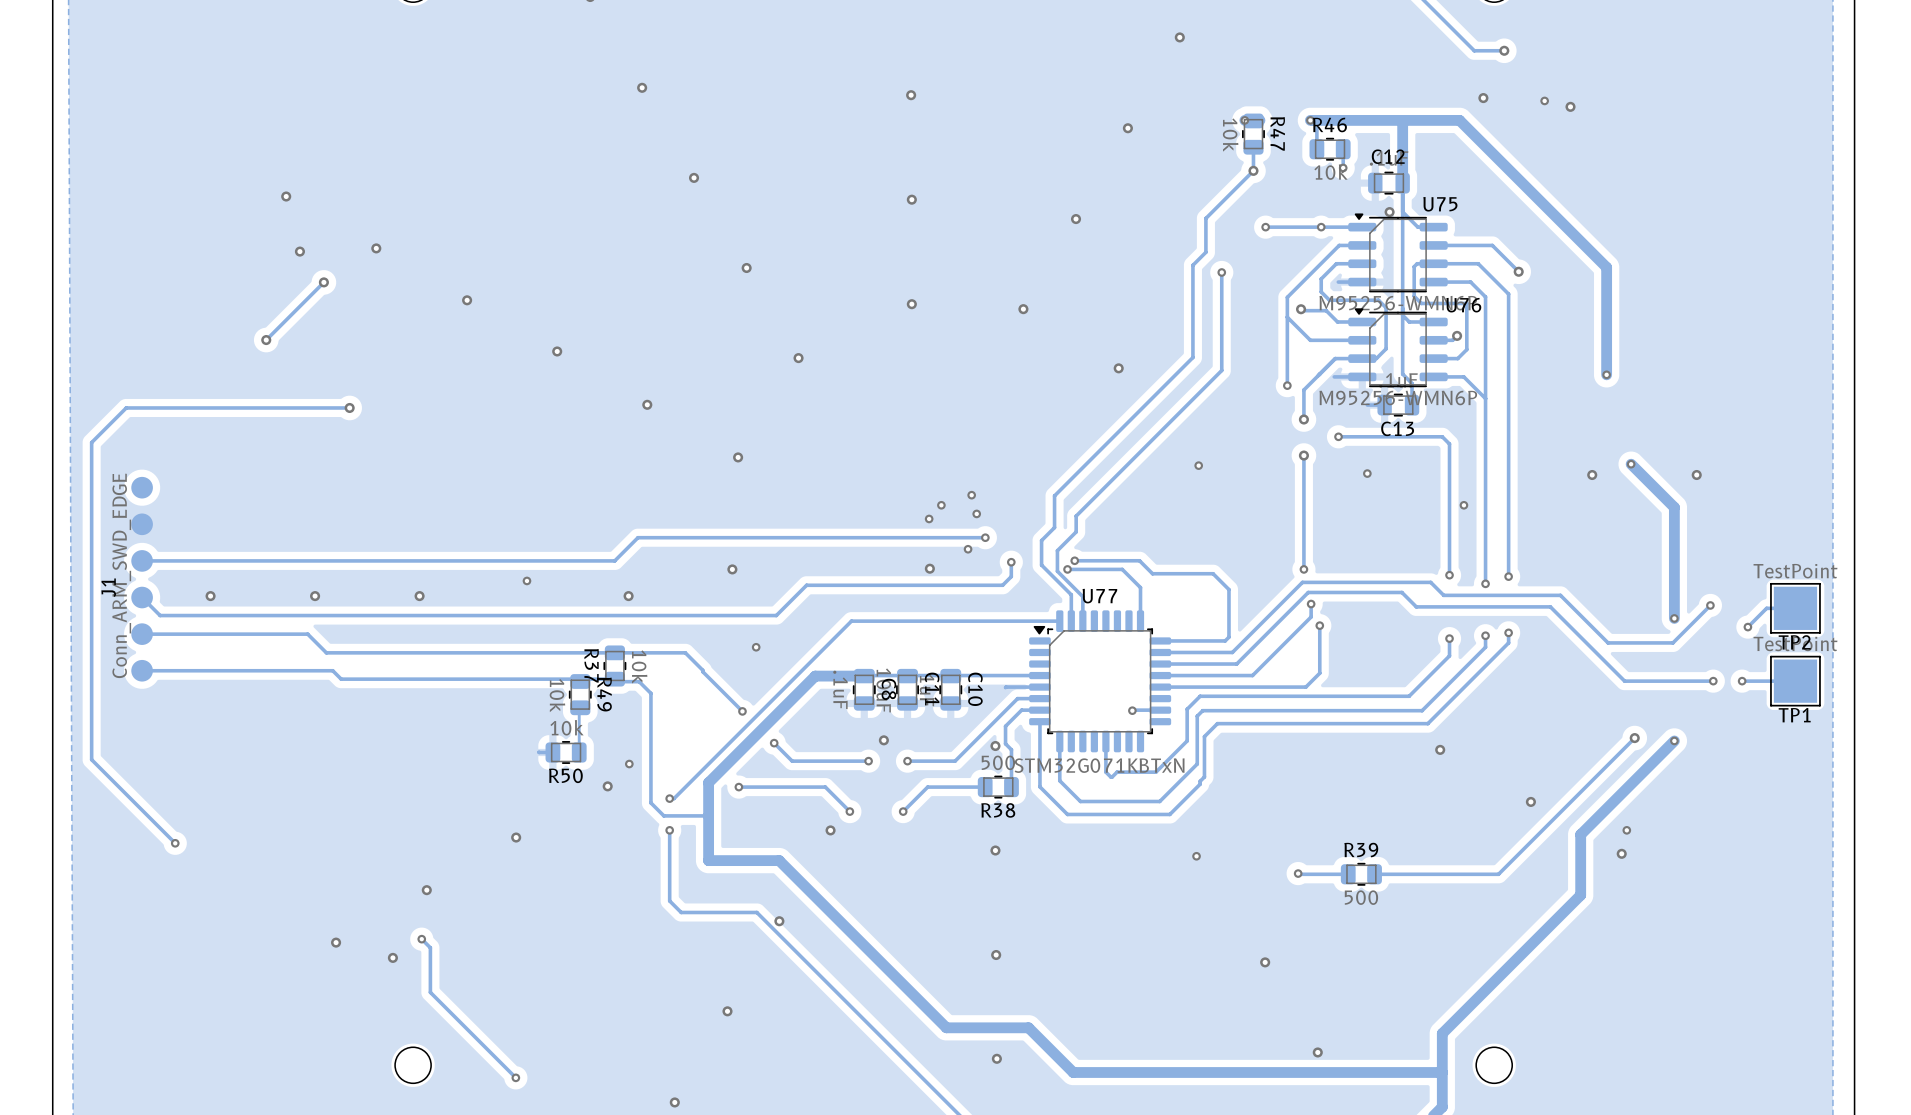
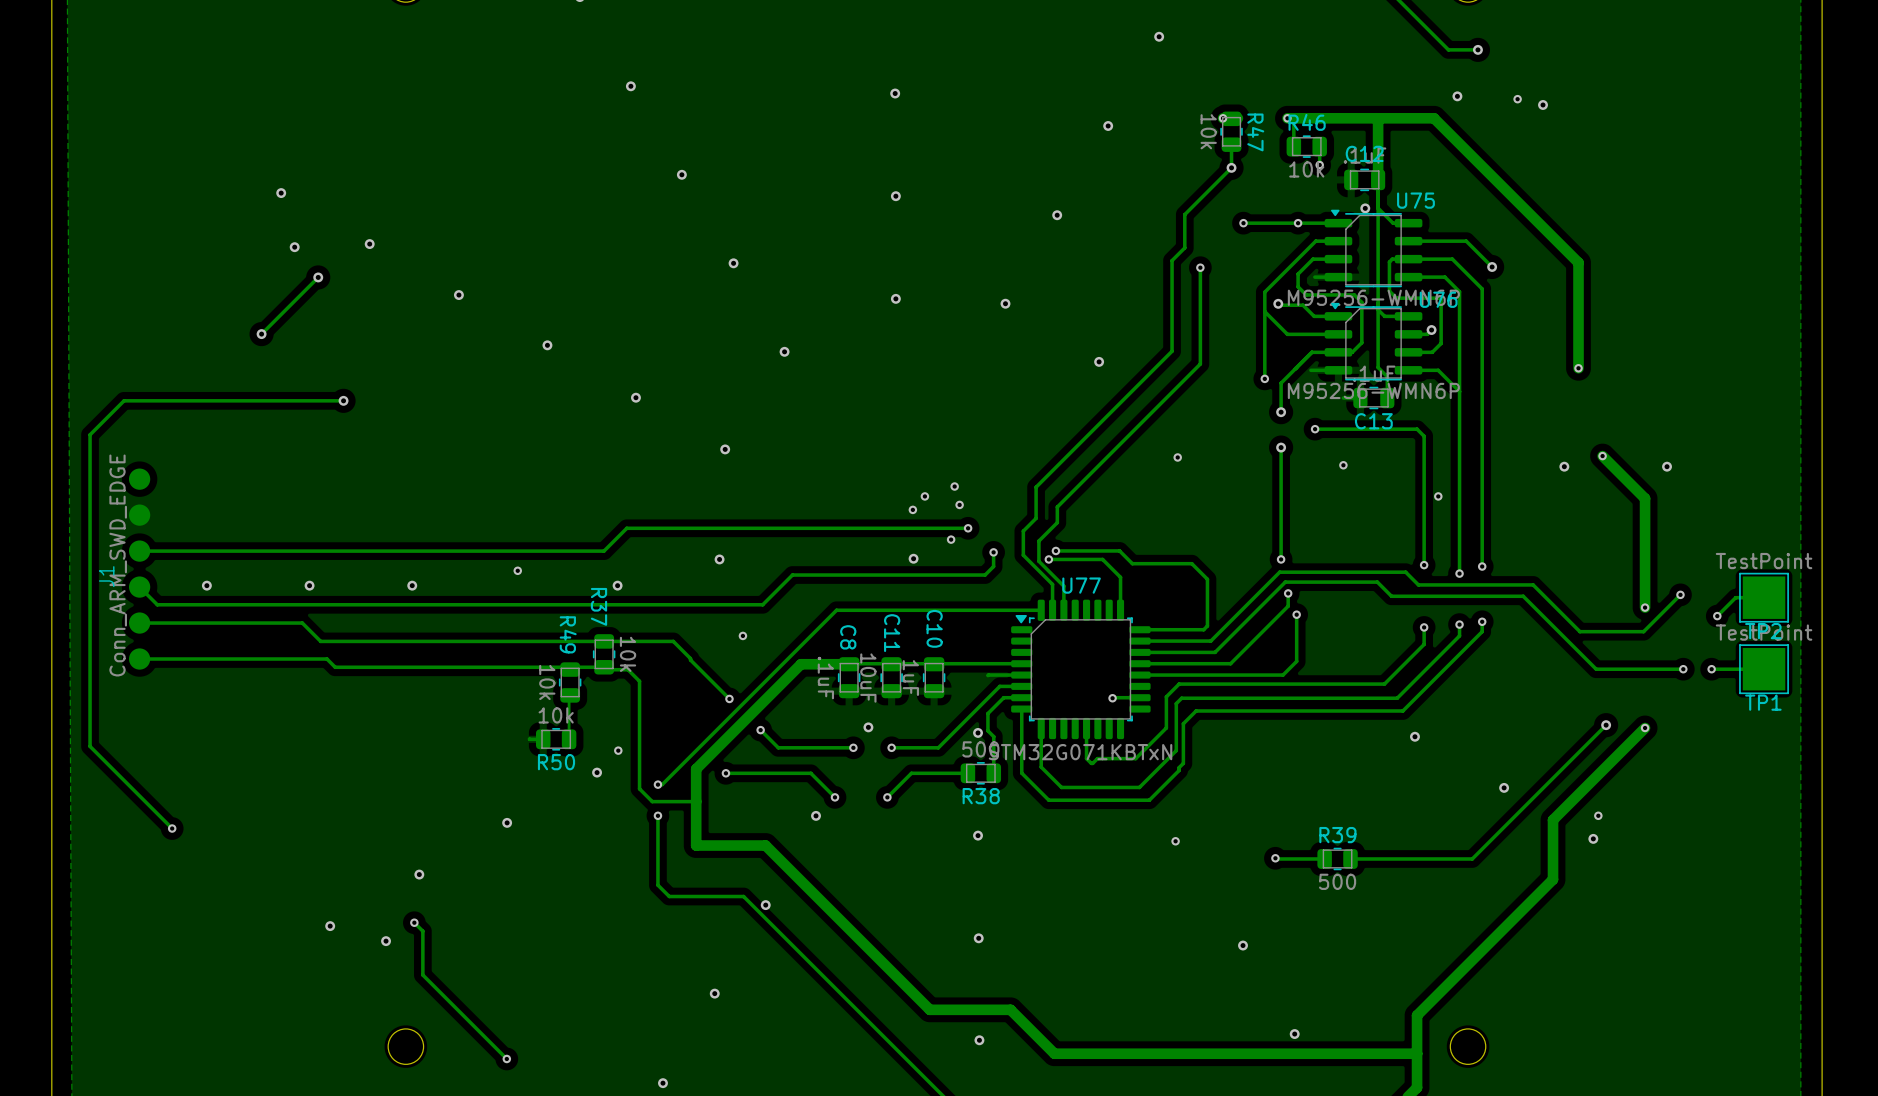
R37 name position: R37 (591, 665) -> R37 (599, 606)
C8 name position: C8 (888, 689) -> C8 (848, 637)
C11 name position: C11 (932, 689) -> C11 (892, 633)
C10 name position: C10 (975, 689) -> C10 (934, 628)
R49 name position: R49 (604, 694) -> R49 (568, 634)

